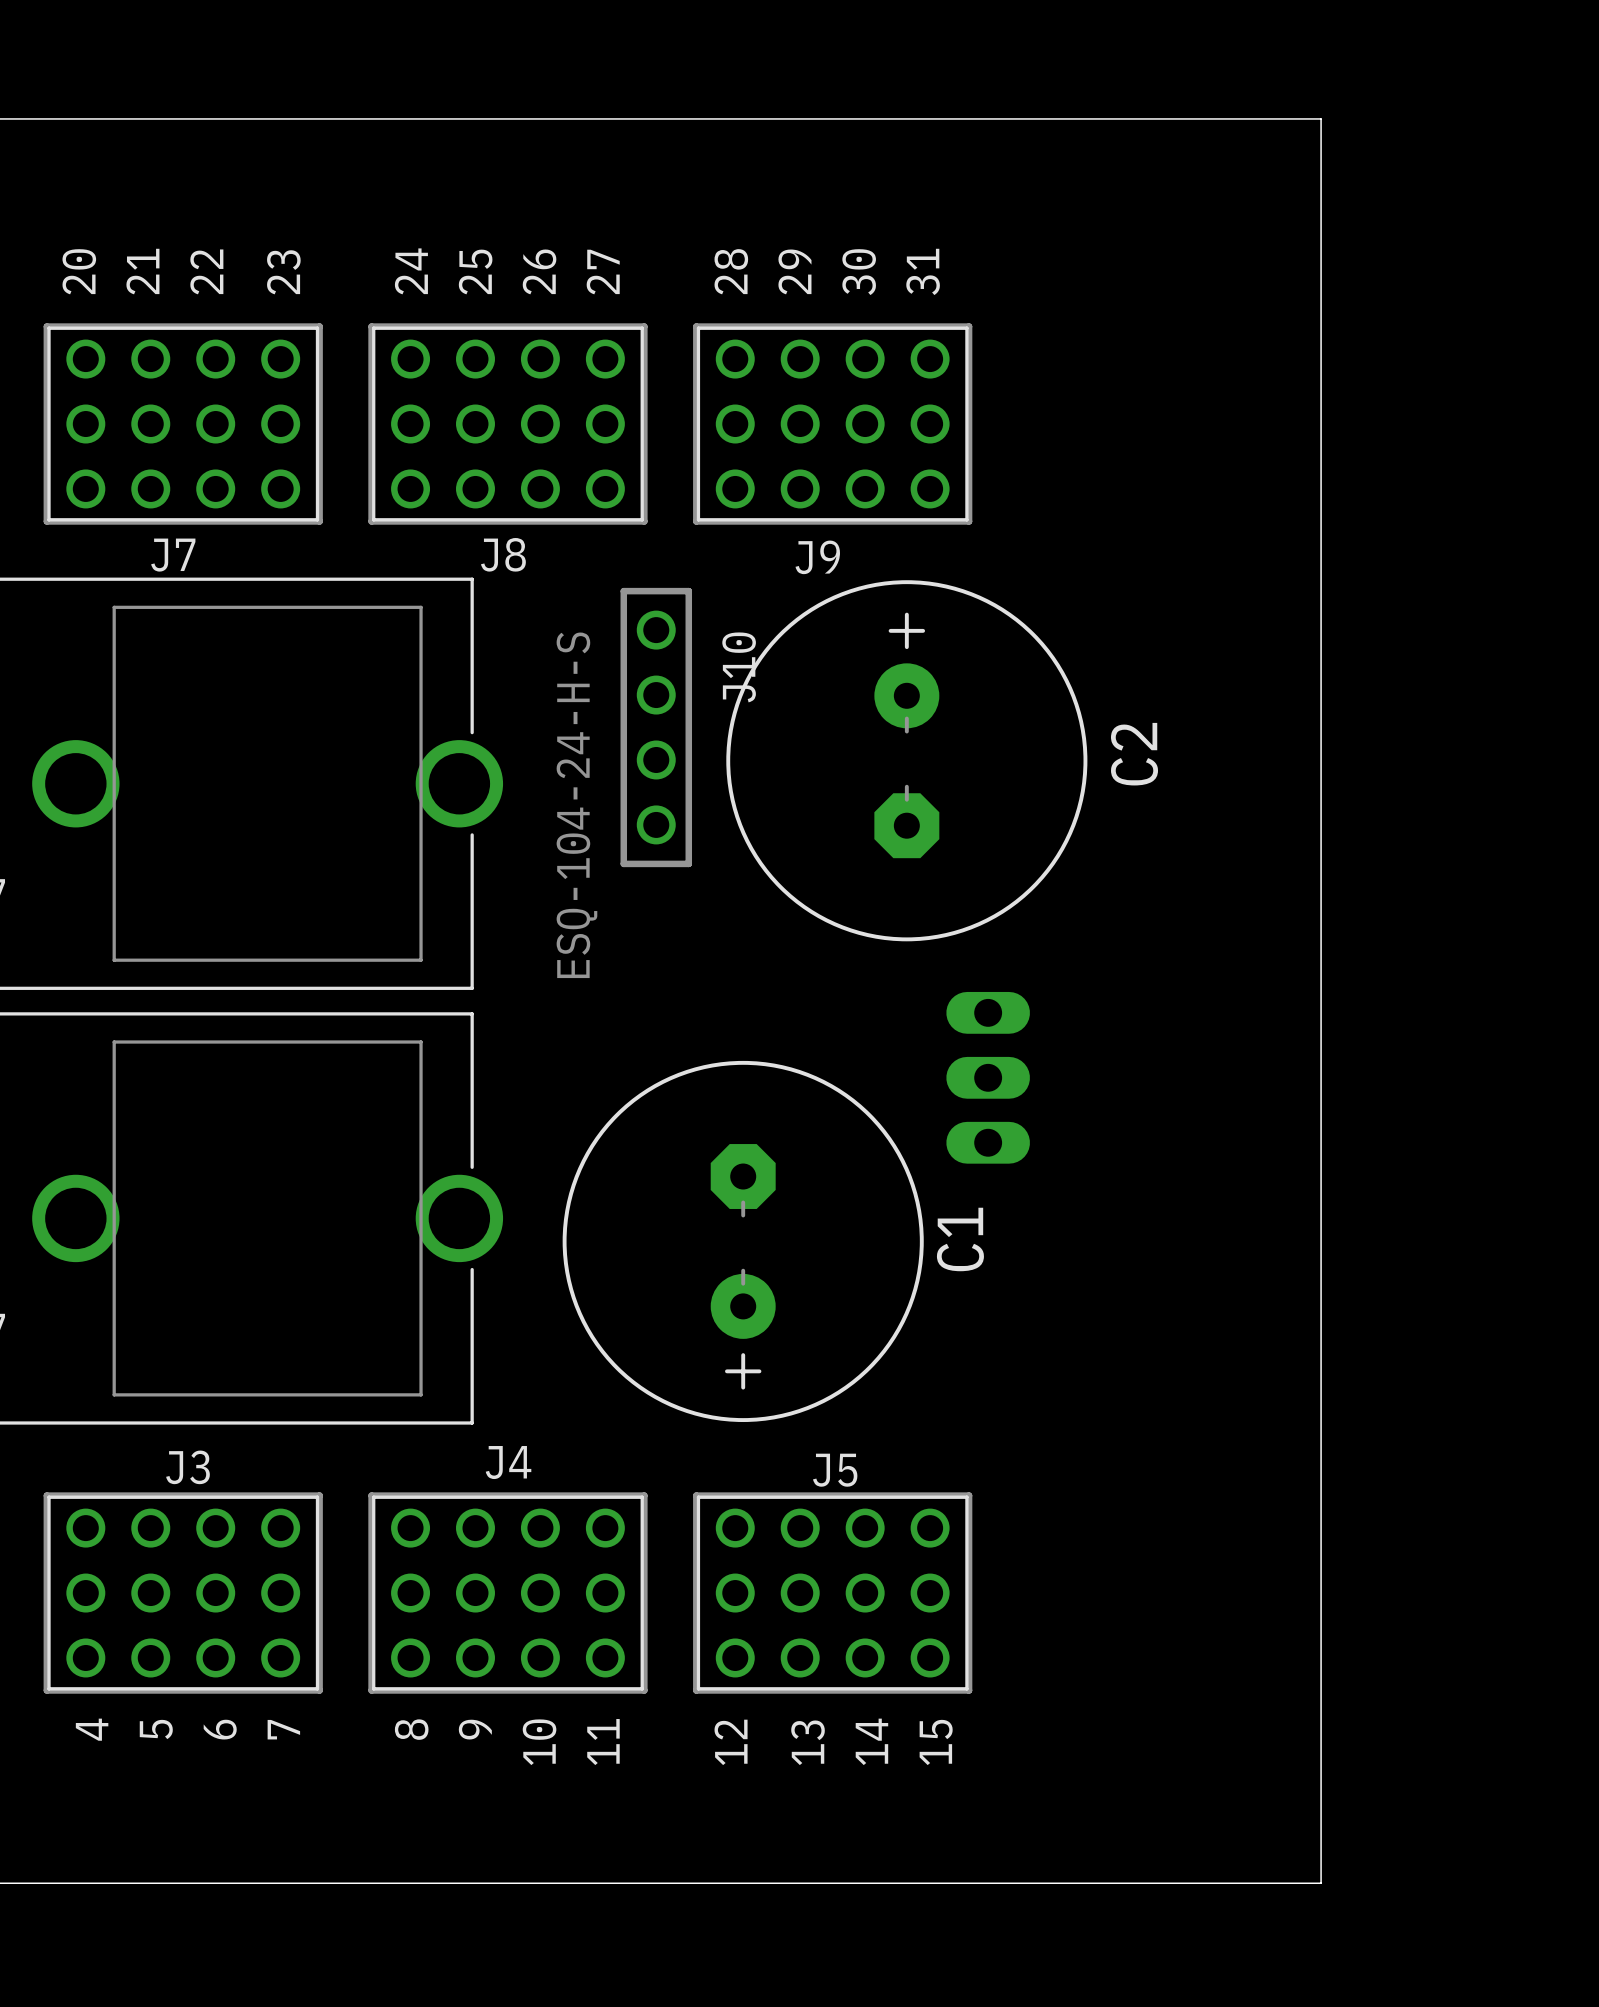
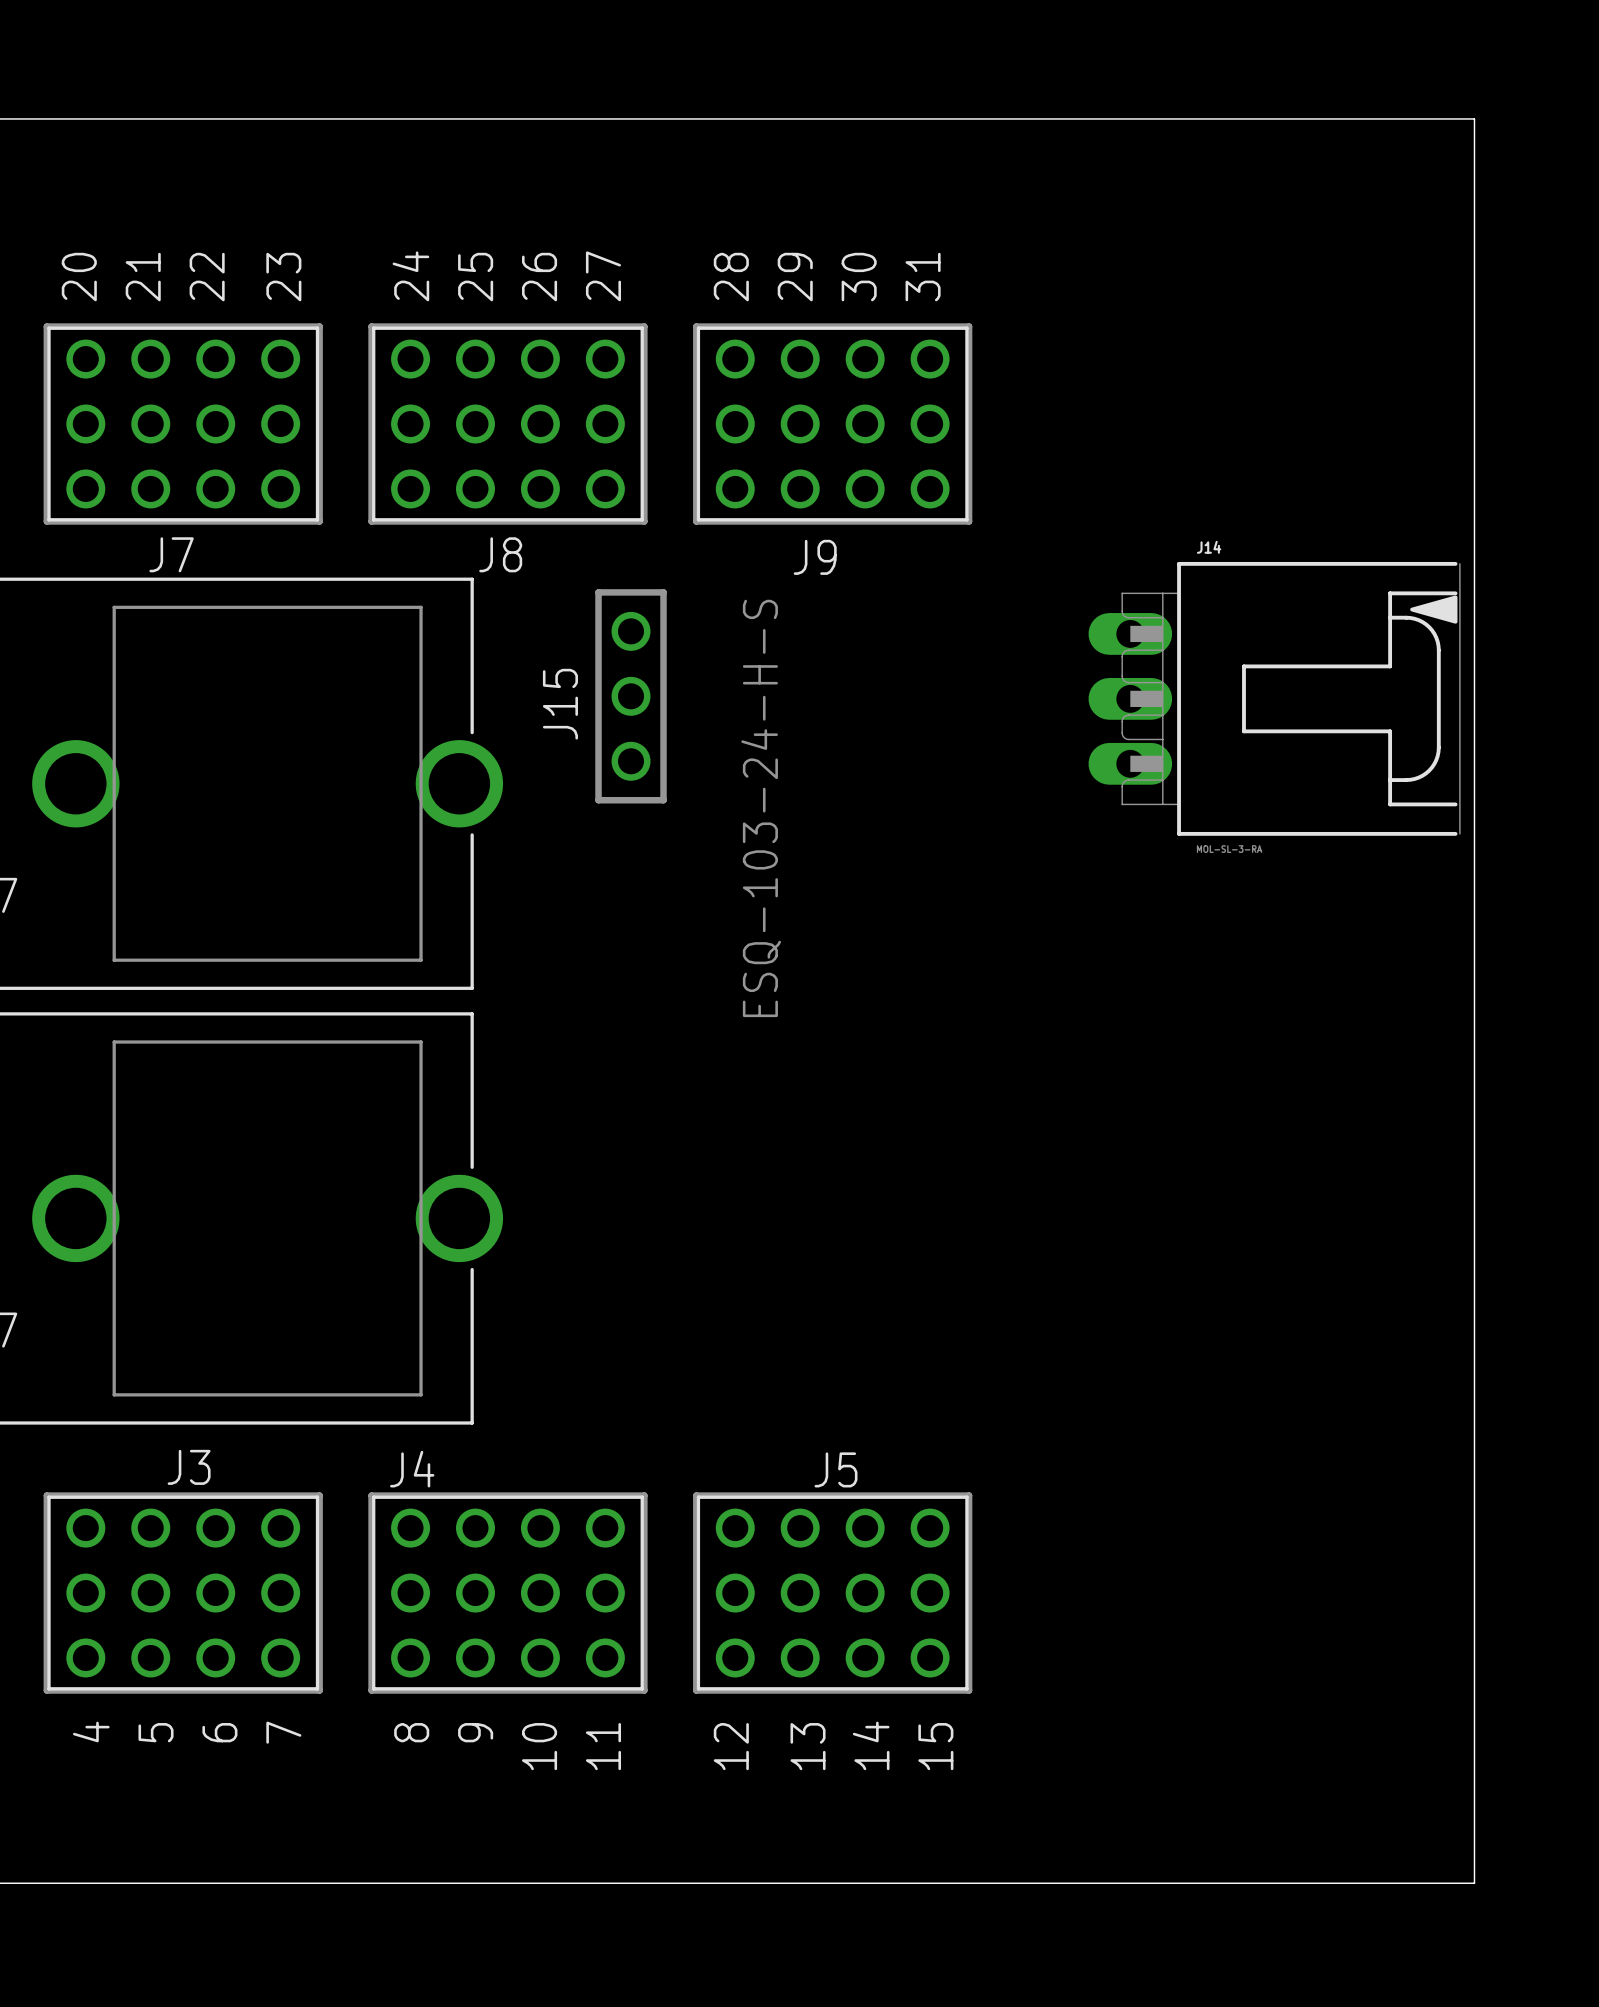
board edge: (1321, 118) (1321, 1883) -> (1321, 118) (1474, 118) (1474, 1883) (1321, 1883)
J15: none -> ESQ-103-24-H-S (631, 696)
J10: ESQ-104-24-H-S (656, 727) -> none
C2: (906, 760) -> none
J14 side: bottom (988, 1077) -> top (1274, 698)
C1: (743, 1241) -> none
J4 name position: J4 (508, 1462) -> J4 (412, 1469)

